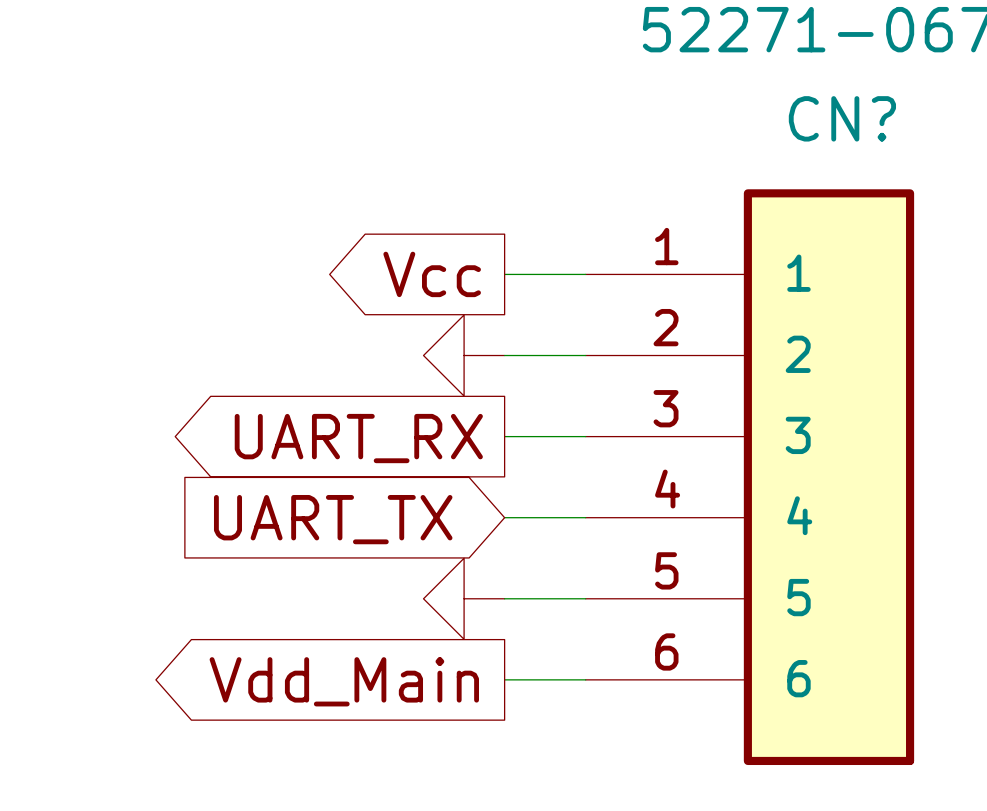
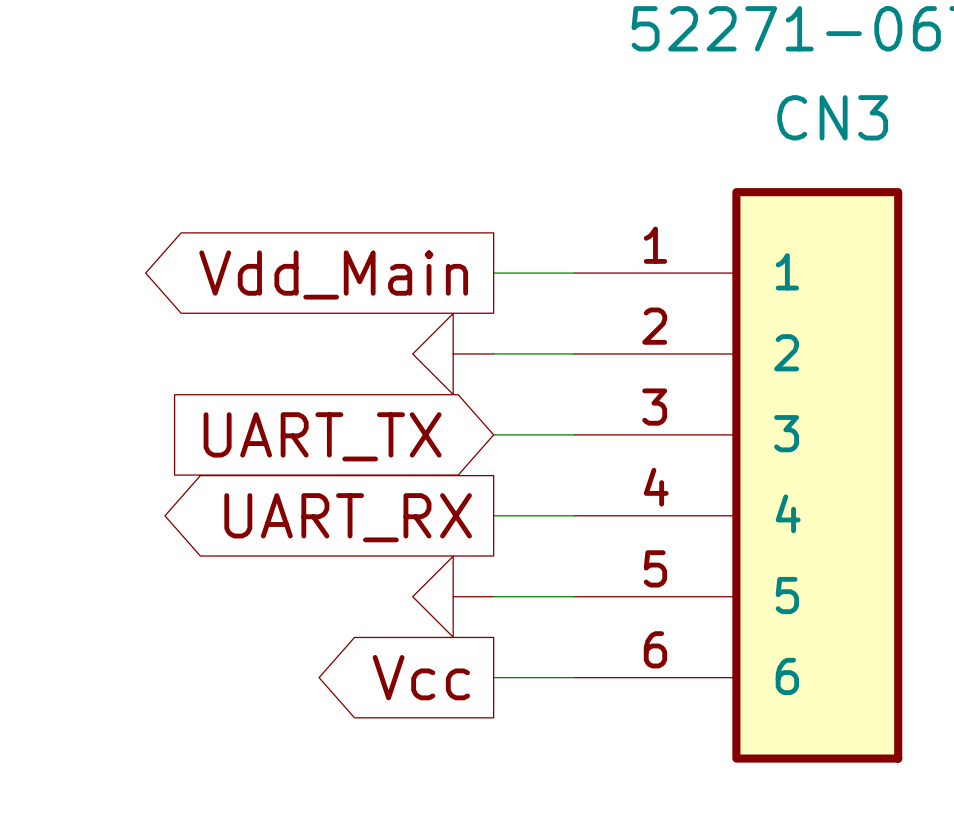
CN? name: CN? (842, 118) -> CN3 (832, 117)
global label: Vcc (432, 274) -> Vdd_Main (333, 274)
global label shape: output (358, 438) -> input (322, 436)
global label: UART_RX (358, 438) -> UART_TX (322, 436)
global label shape: input (333, 519) -> output (348, 517)
global label: UART_TX (333, 519) -> UART_RX (348, 517)
global label: Vdd_Main (344, 681) -> Vcc (421, 677)

